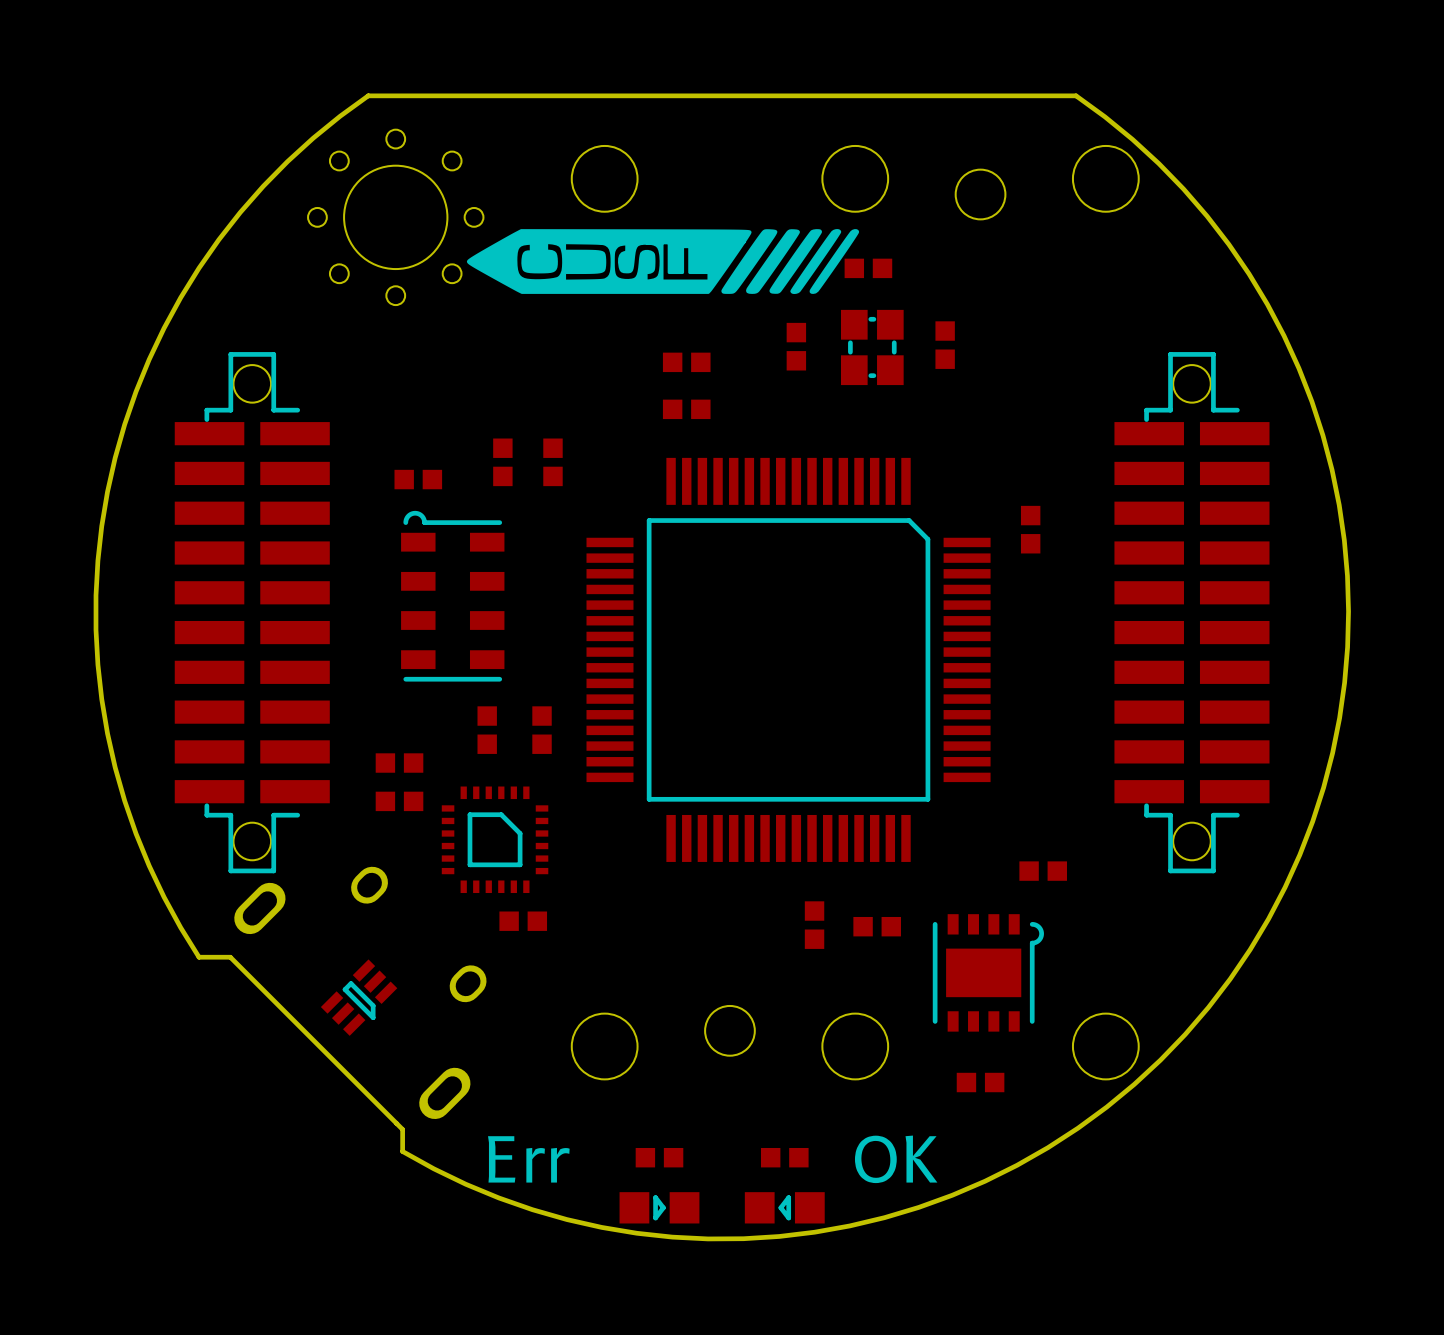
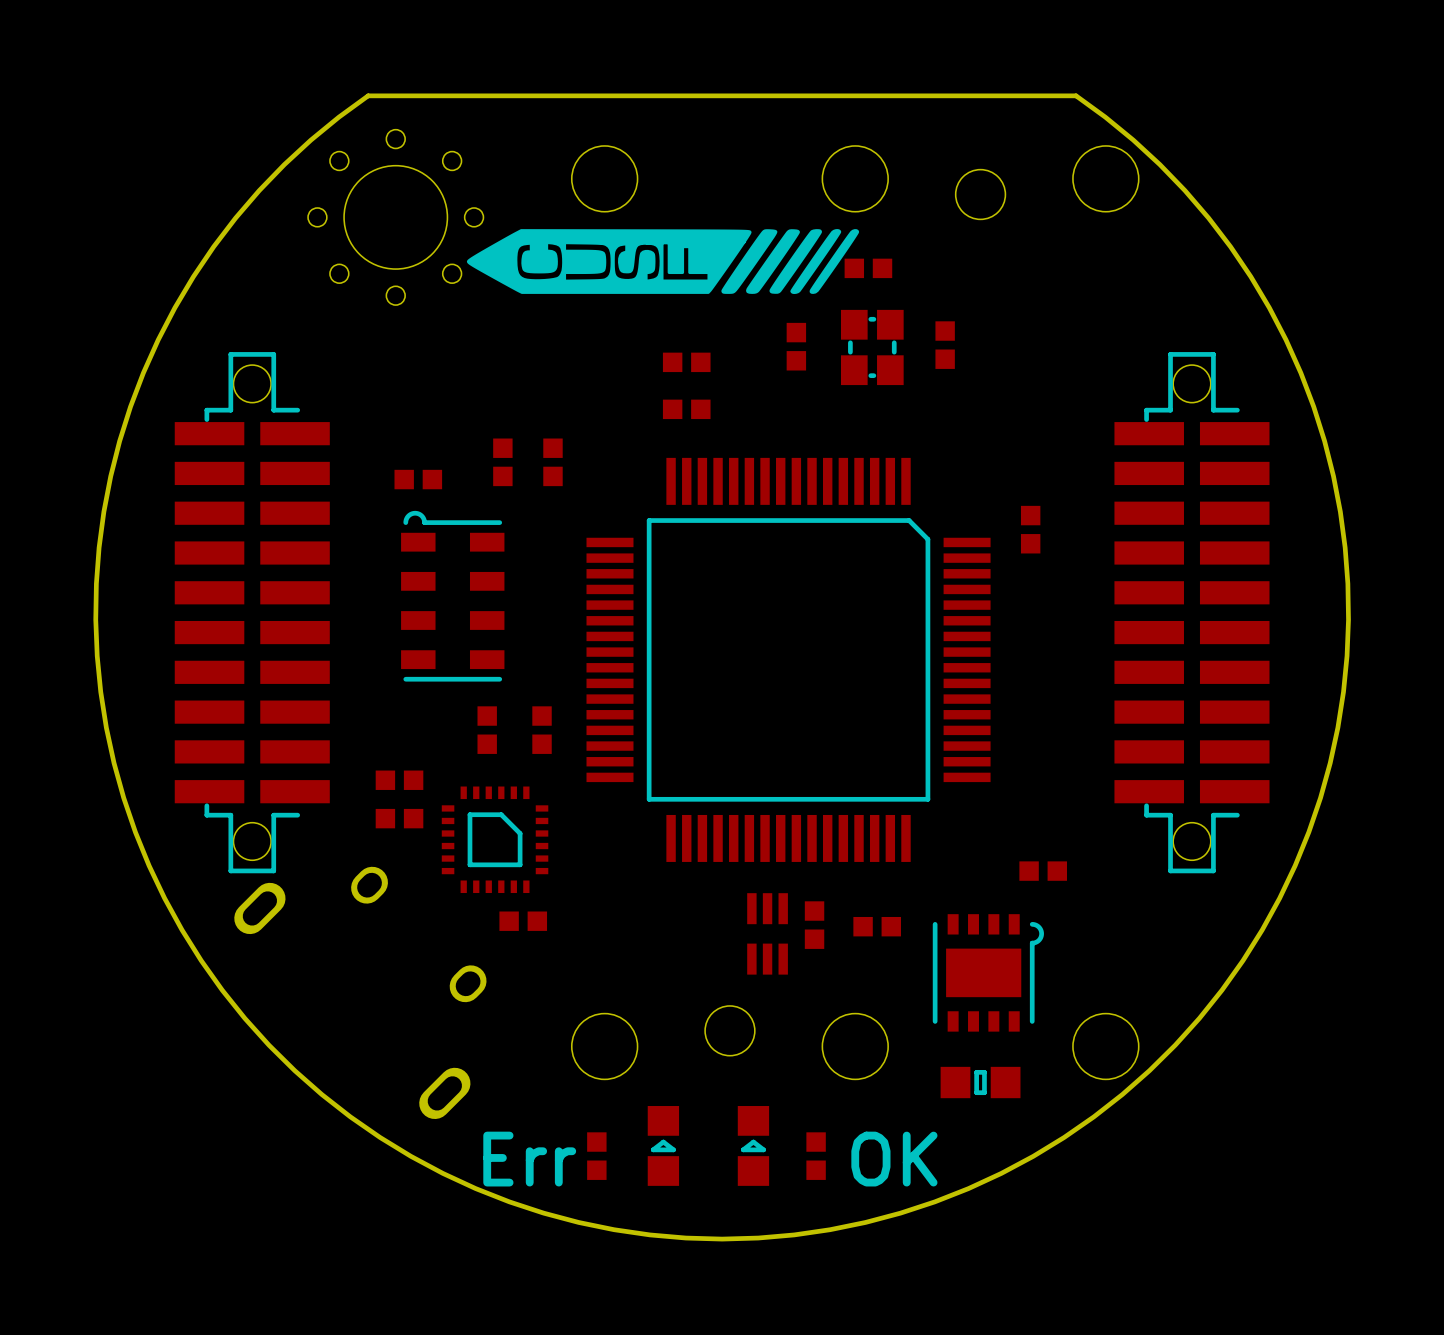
board edge: (368, 95) (313, 138) (287, 161) (240, 212) (218, 239) (199, 268) (164, 328) (149, 359) (124, 424) (107, 491) (101, 526) (95, 595) (95, 630) (101, 699) (115, 767) (124, 800) (149, 865) (164, 897) (199, 957) (230, 957) (402, 1129) (402, 1151) (465, 1184) (532, 1209) (601, 1227) (672, 1237) (708, 1238) (779, 1236) (814, 1232) (884, 1217) (952, 1195) (985, 1181) (1017, 1165) (1077, 1128) (1134, 1084) (1160, 1060) (1208, 1007) (1250, 949) (1268, 918) (1299, 854) (1312, 821) (1332, 753) (1339, 718) (1344, 682) (1348, 611) (1347, 575) (1339, 505) (1322, 435) (1311, 401) (1298, 368) (1267, 304) (1228, 244) (1183, 189) (1158, 163) (1132, 139) (1076, 95) -> (368, 95) (310, 140) (284, 164) (235, 218) (213, 246) (174, 307) (158, 339) (130, 406) (110, 476) (103, 511) (96, 583) (97, 656) (100, 692) (106, 727) (123, 797) (149, 865) (182, 930) (201, 960) (244, 1018) (269, 1045) (321, 1094) (350, 1116) (380, 1137) (442, 1173) (475, 1188) (543, 1213) (614, 1229) (685, 1238) (722, 1239) (794, 1234) (830, 1229) (900, 1213) (968, 1188) (1001, 1173) (1064, 1137) (1093, 1116) (1122, 1094) (1175, 1045) (1199, 1018) (1242, 960) (1279, 898) (1295, 865) (1320, 797) (1330, 763) (1343, 692) (1348, 619) (1345, 547) (1340, 511) (1333, 476) (1313, 406) (1286, 339) (1269, 307) (1230, 246) (1208, 218) (1159, 164) (1133, 140) (1076, 95)
part: (399, 763) -> none
part: none -> (399, 780)
part: (399, 801) -> none
part: none -> (399, 818)
part: none -> (767, 933)
part: (359, 997) -> none
part footprint: [956, 1072, 1005, 1093] -> [940, 1066, 1021, 1099]
part: none -> (753, 1145)
part footprint: [635, 1147, 684, 1168] -> [647, 1106, 680, 1186]
part: none -> (596, 1156)
part rotation: 0° (784, 1157) -> 90° clockwise (816, 1156)
part position: (784, 1157) -> (816, 1156)
part: (659, 1207) -> none
part: (784, 1207) -> none

